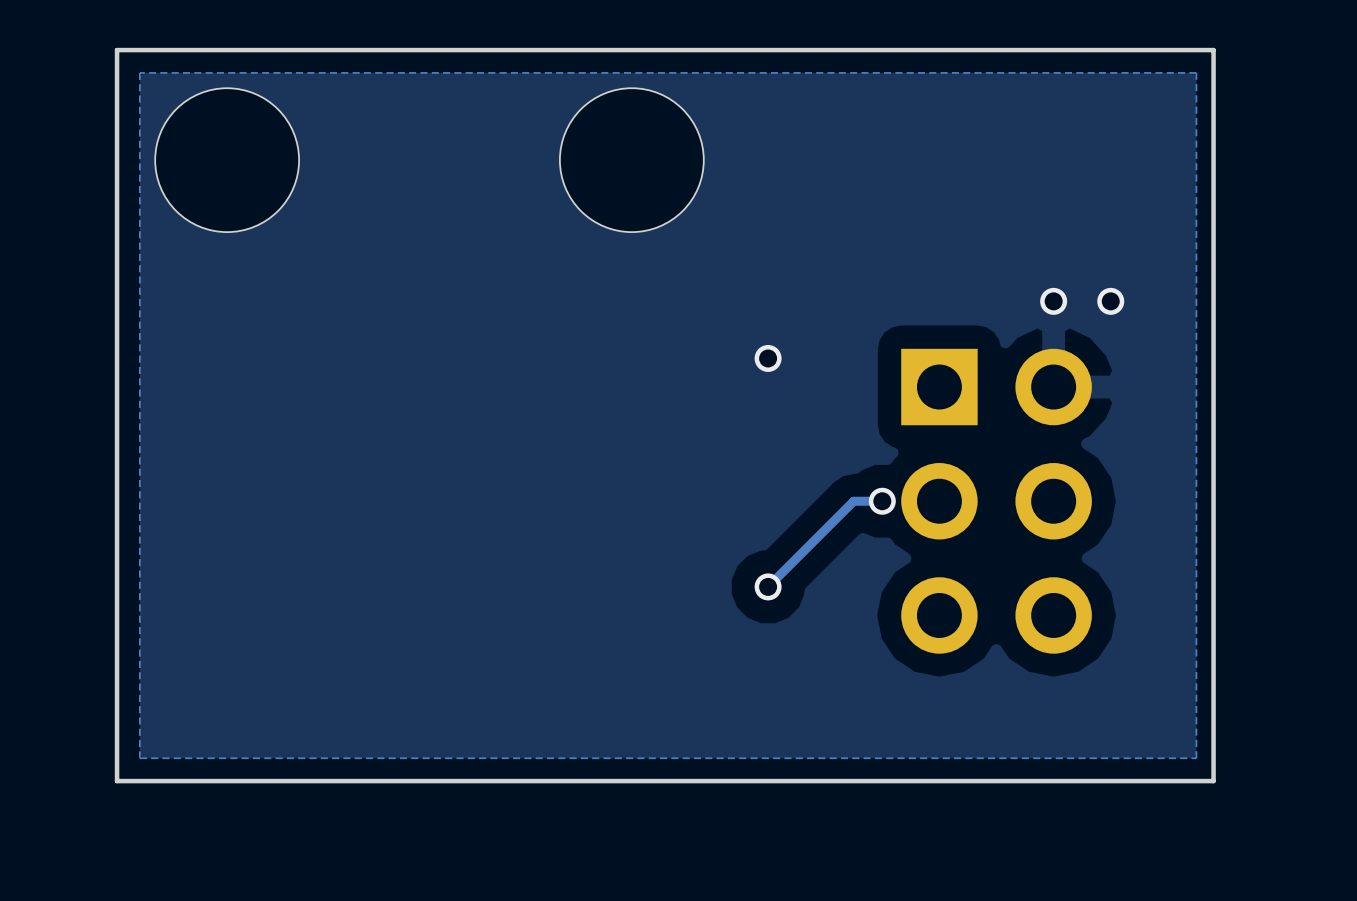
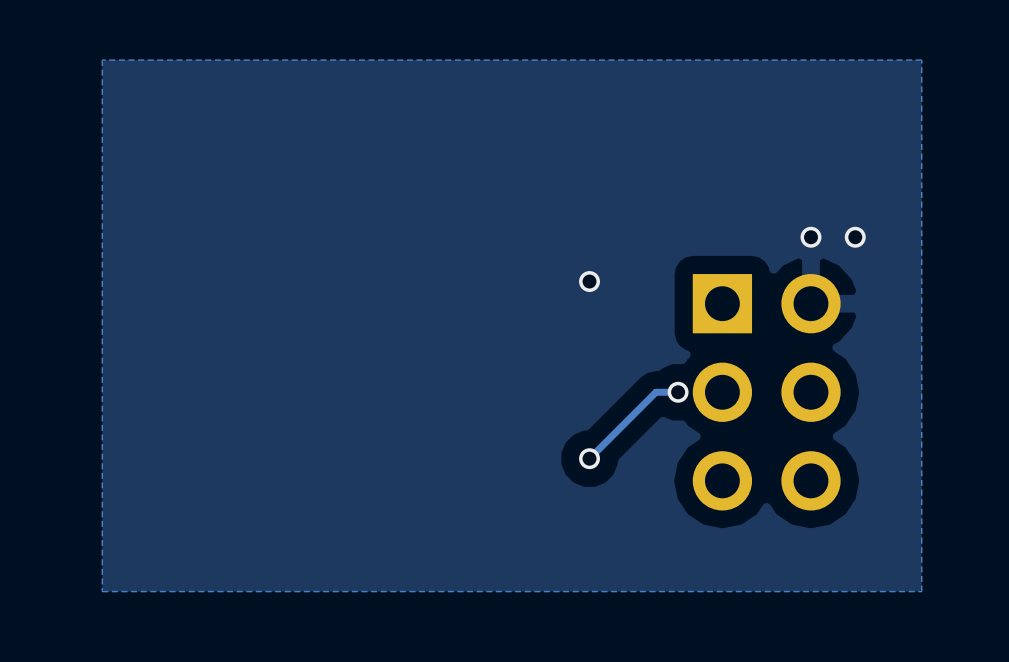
board edge: (1213, 50) (117, 50) (117, 781) (1213, 781) (1213, 50) -> none
part: (227, 160) -> none
part: (631, 160) -> none

